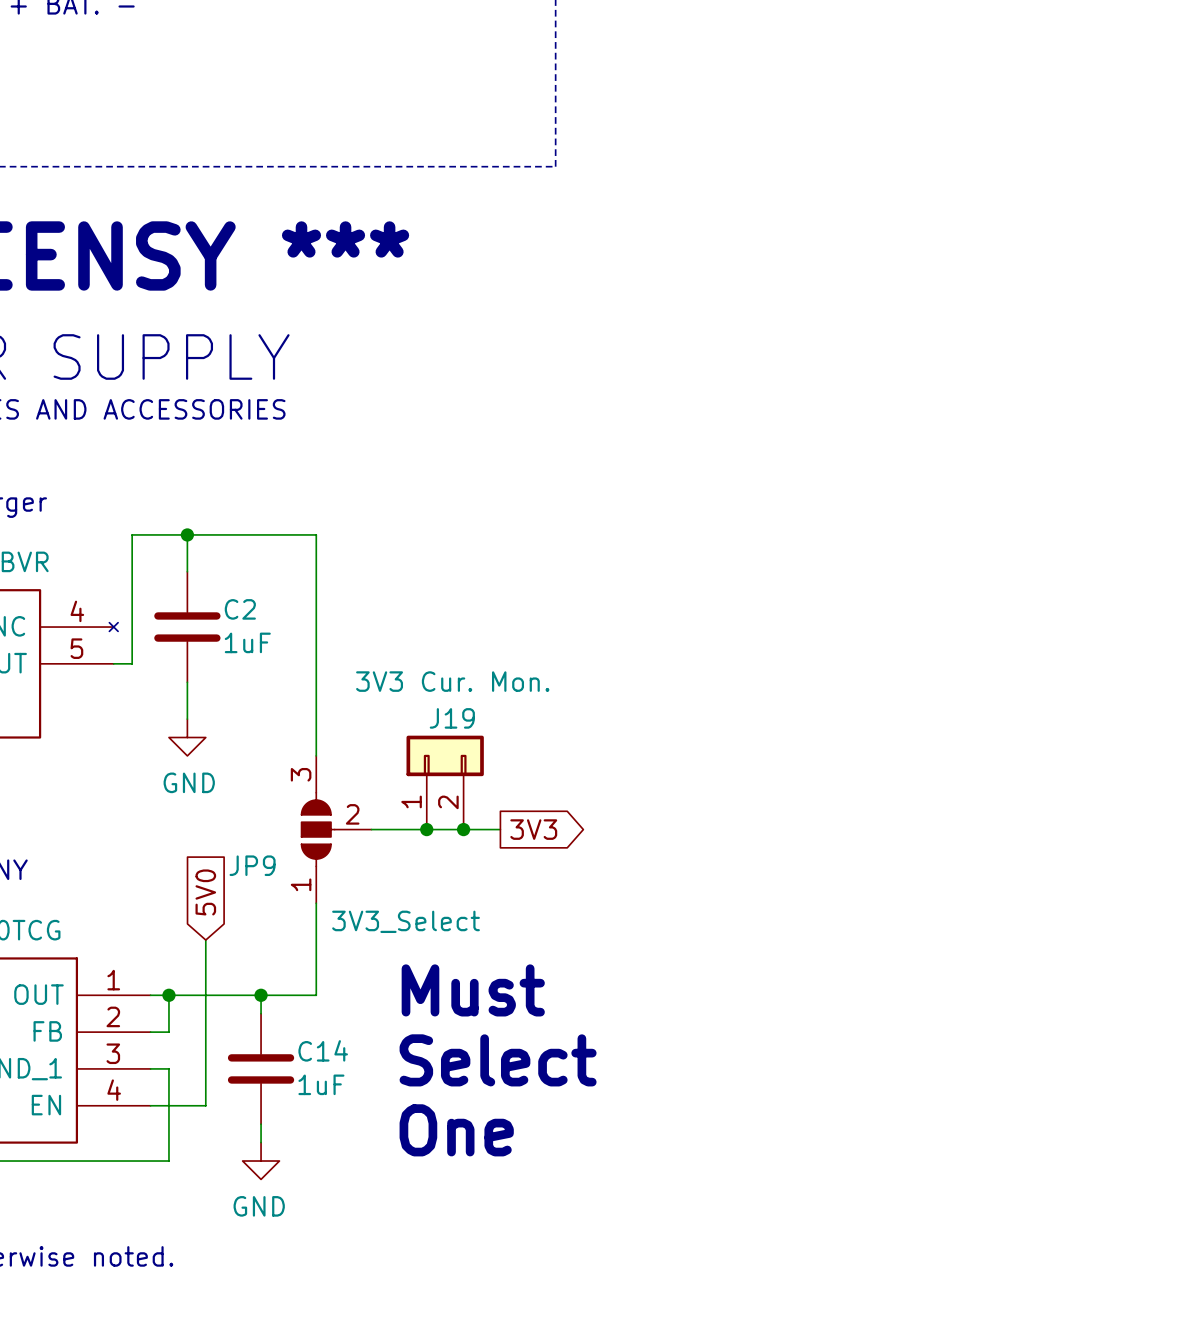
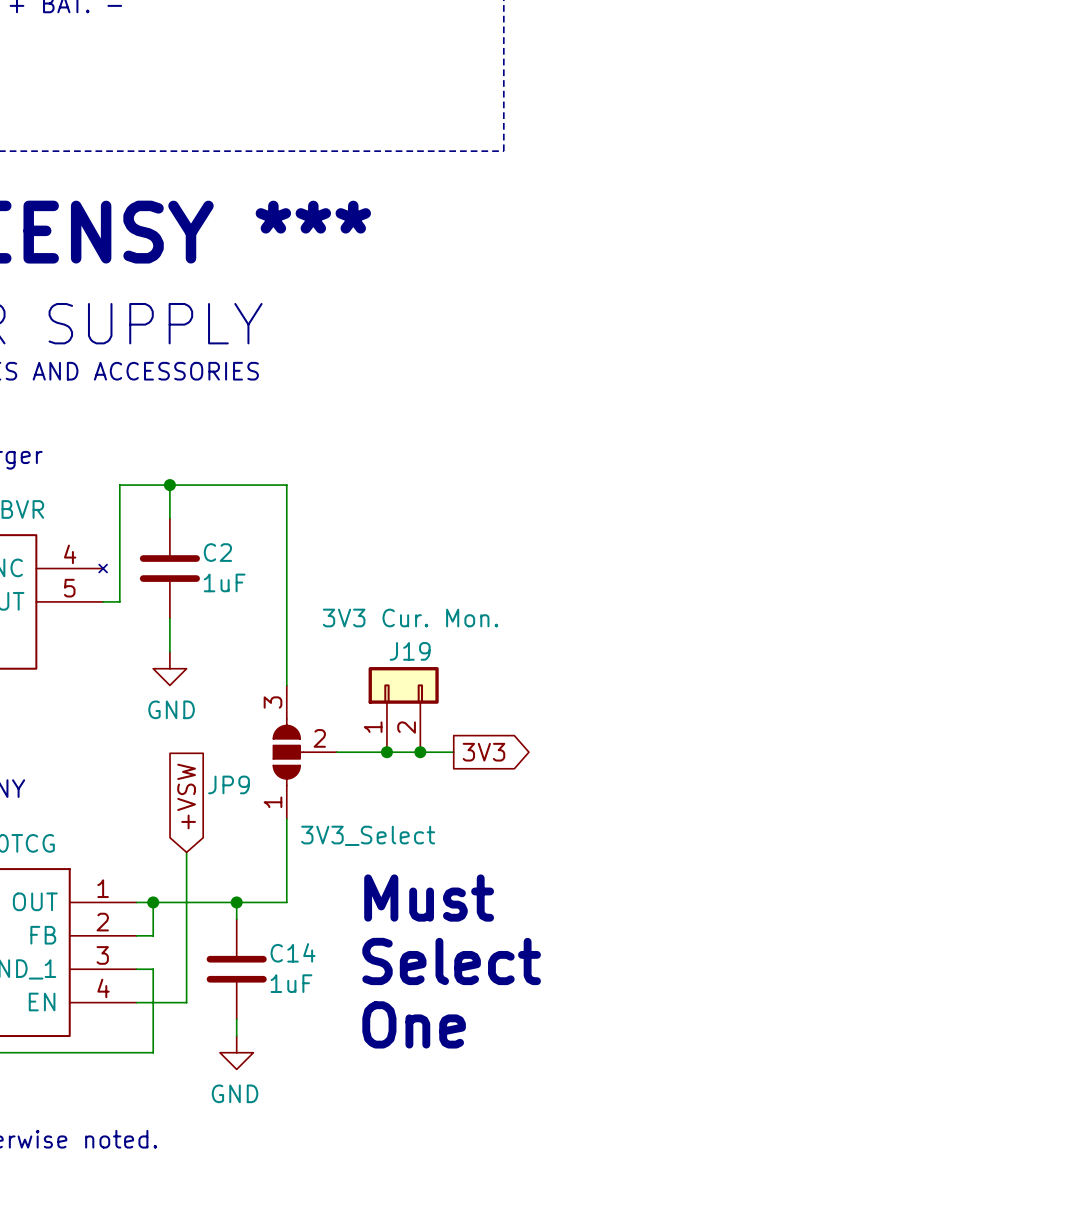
global label: 5V0 (205, 892) -> +VSW (186, 796)

